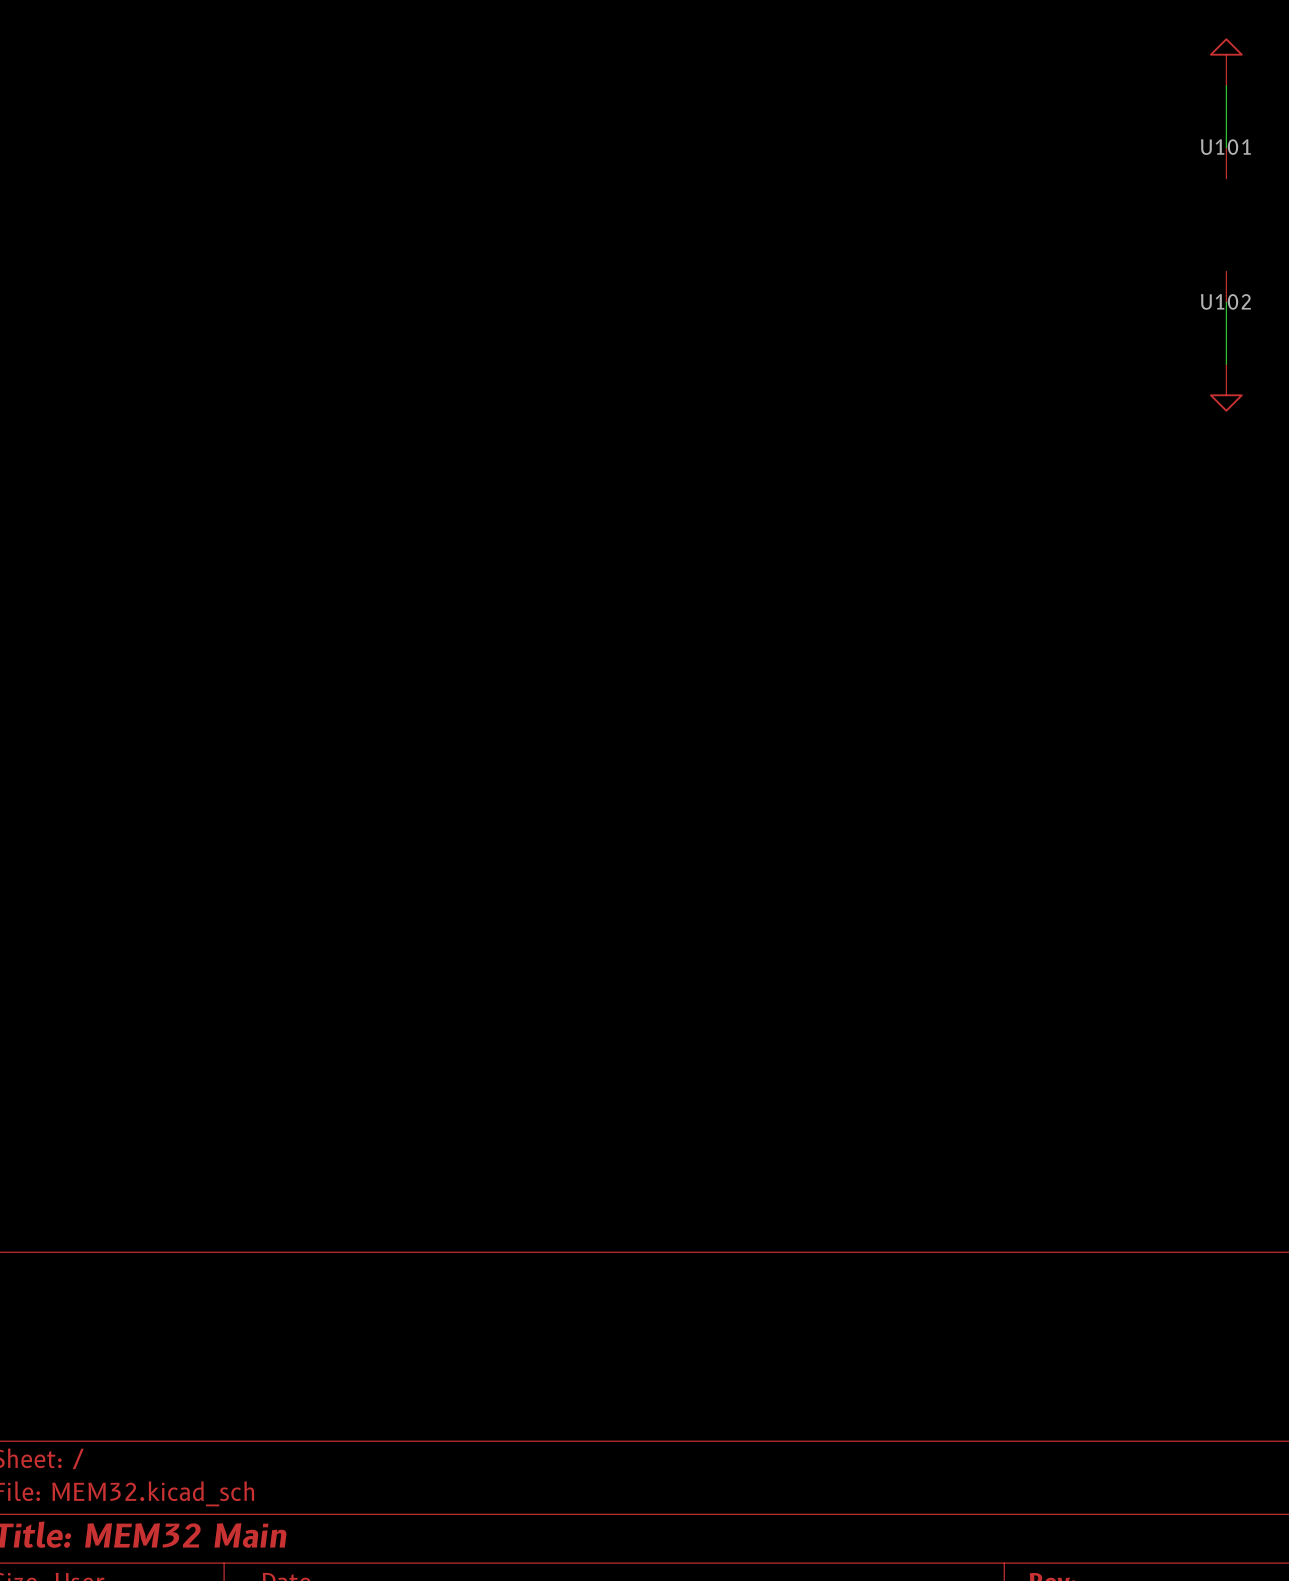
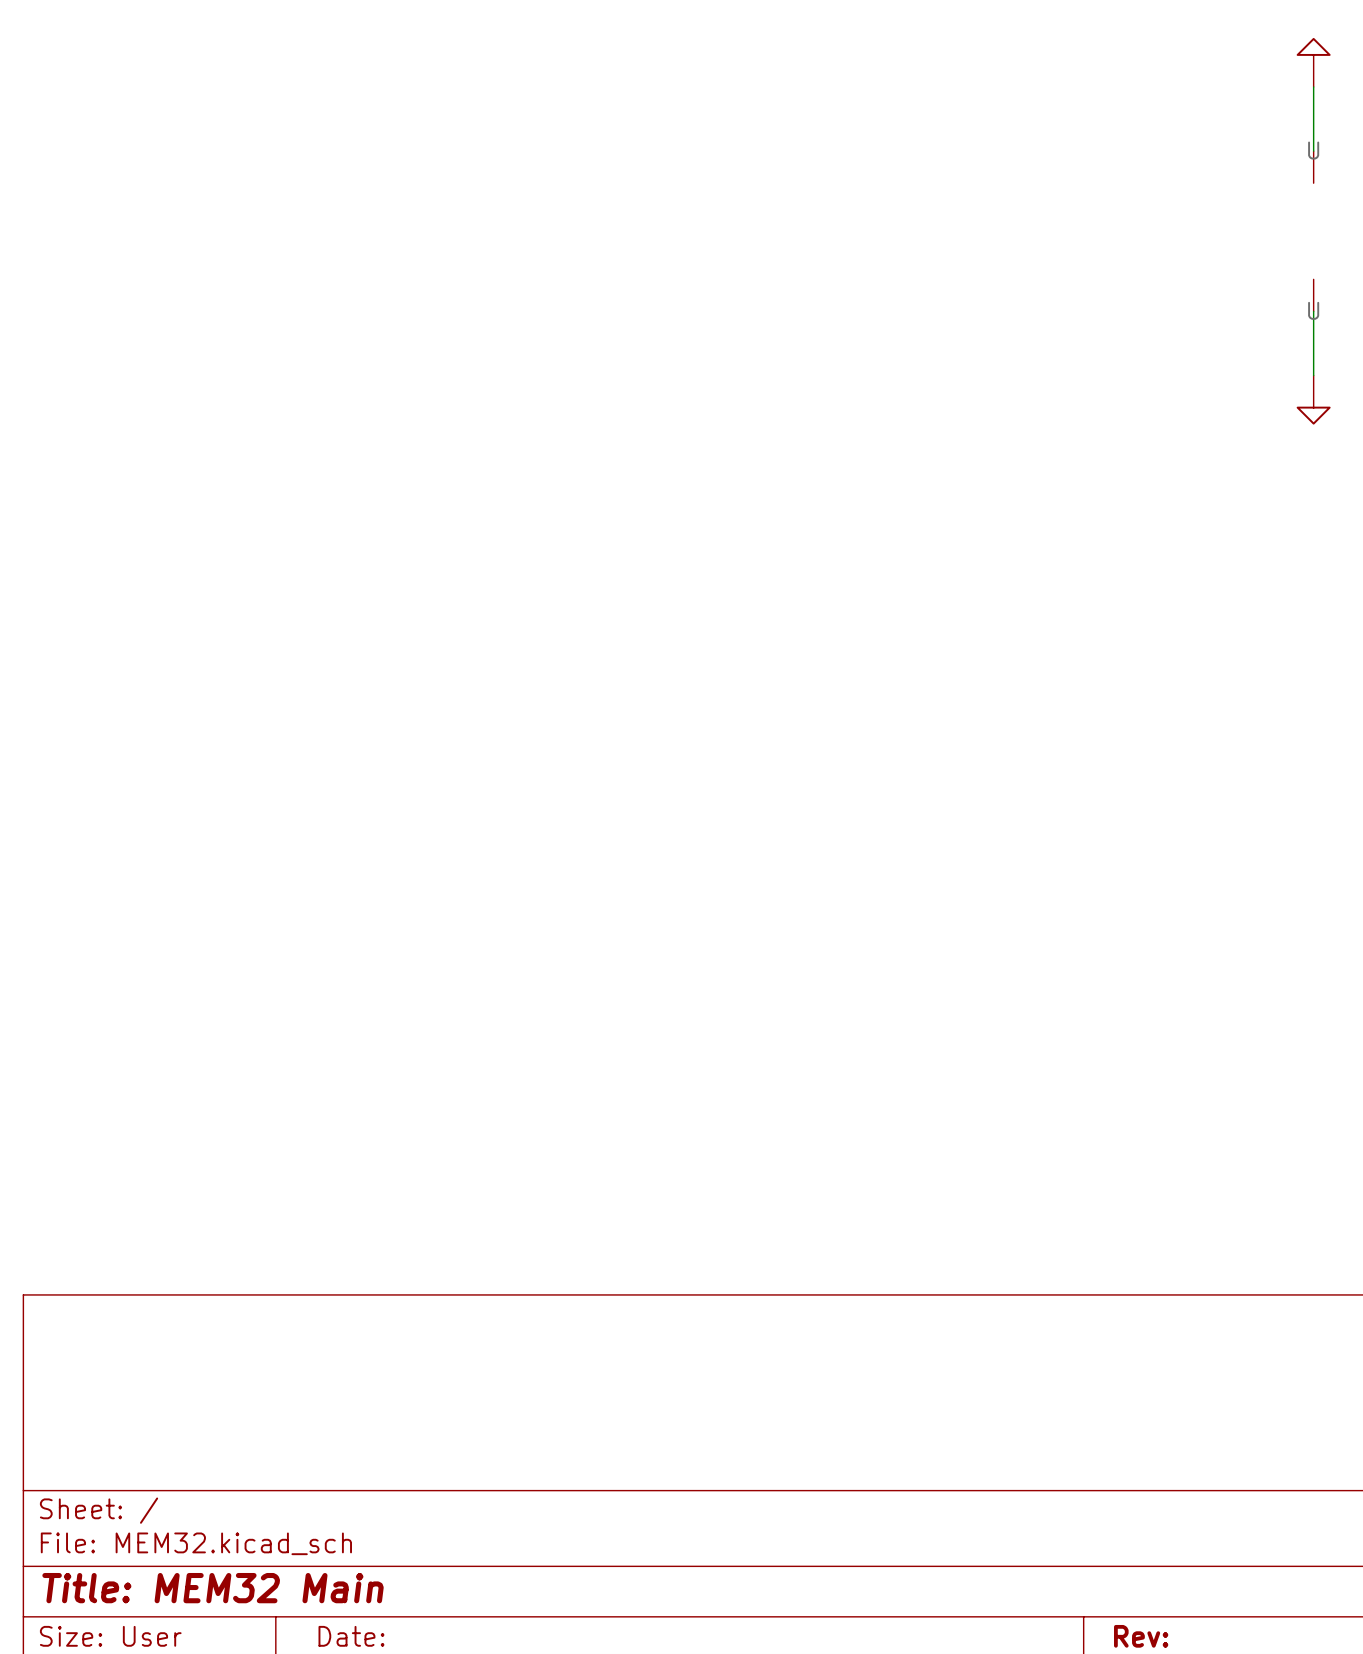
U101 name: U101 (1225, 147) -> U (1313, 150)
U102 name: U102 (1225, 301) -> U (1313, 310)

